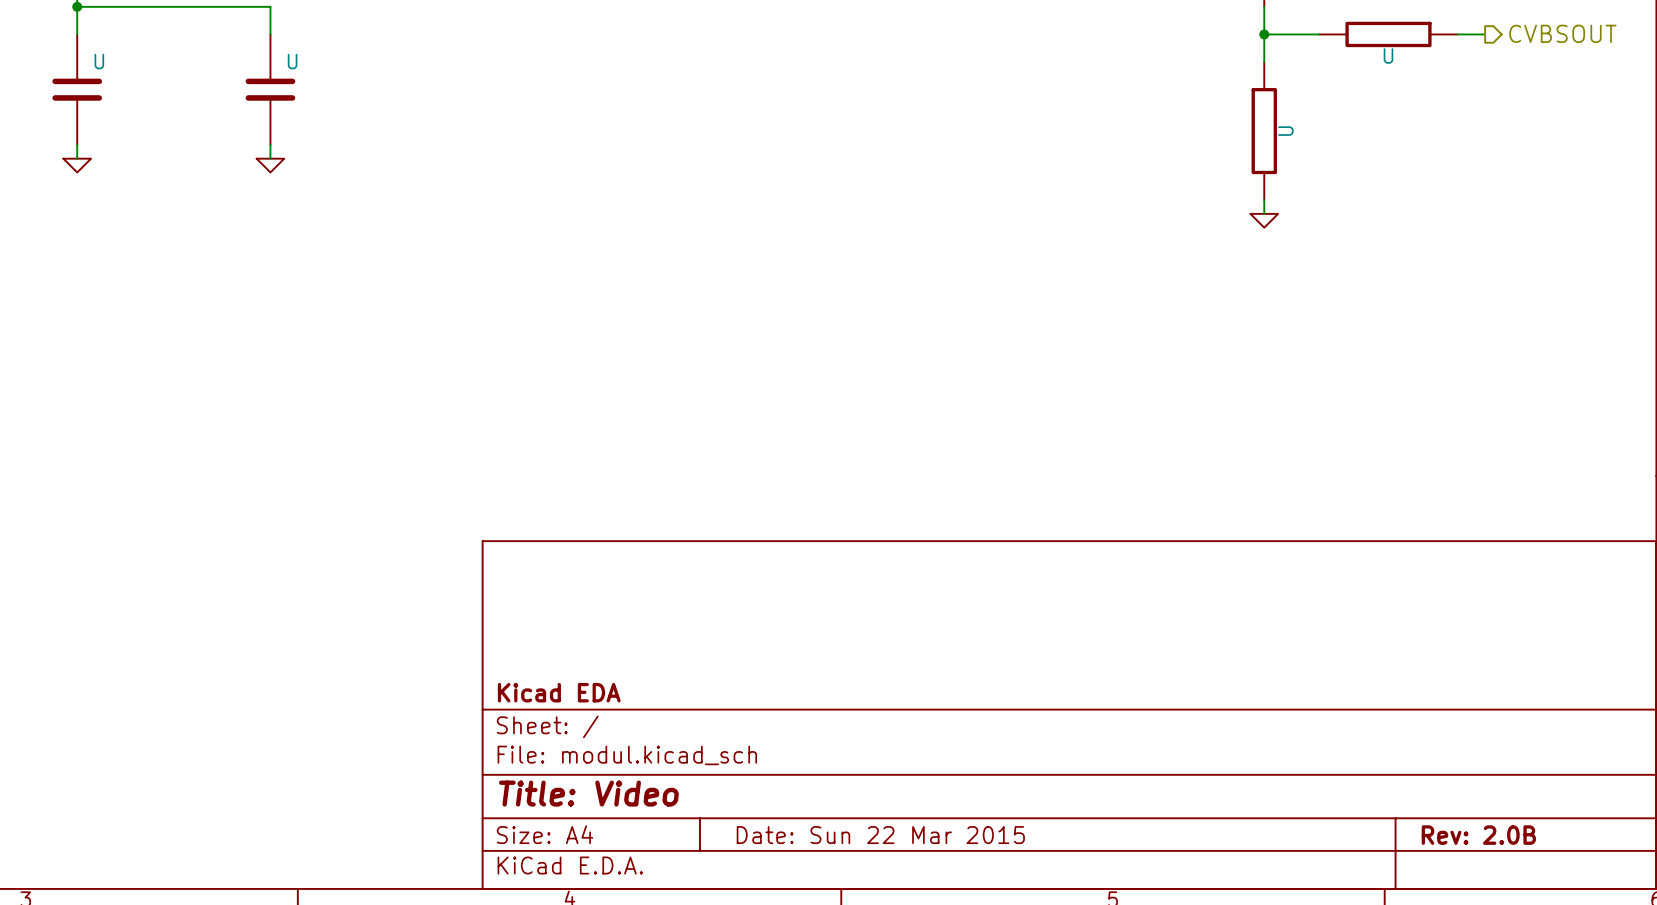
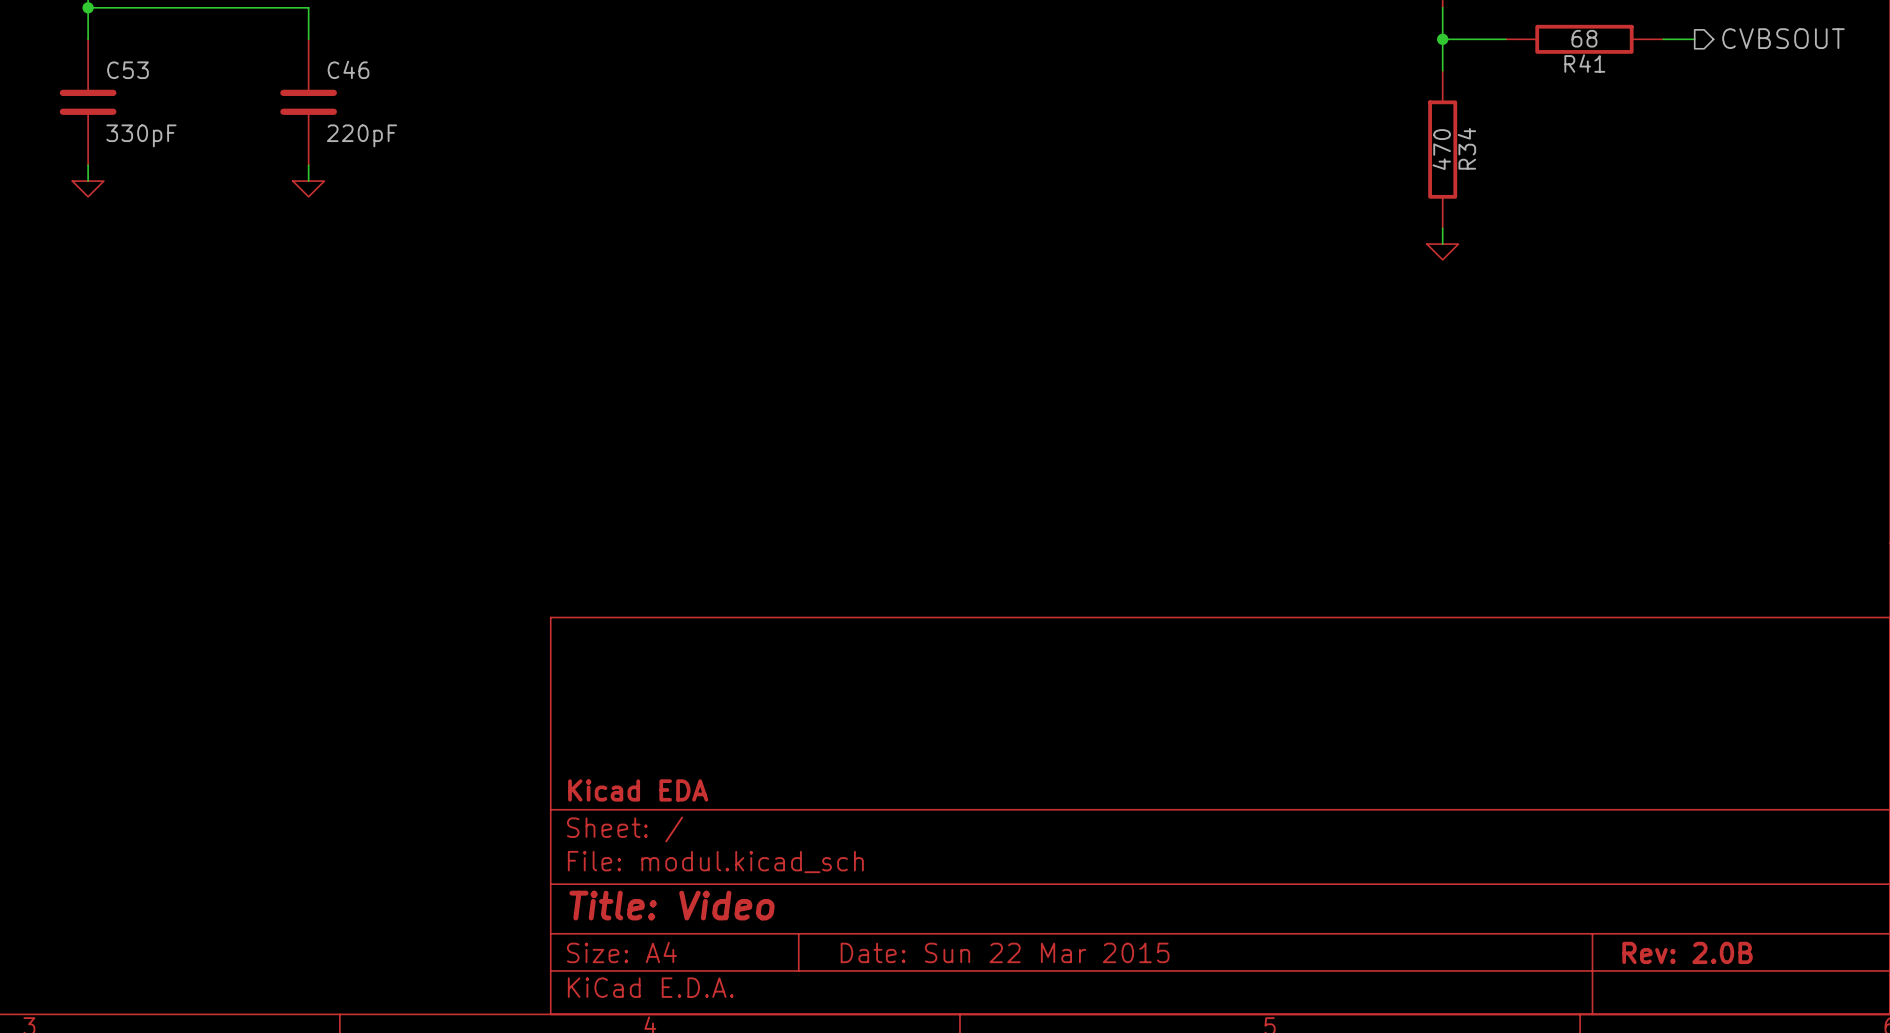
U value: none -> 68 (1584, 38)
U name: U (1388, 56) -> R41 (1584, 63)
U name: U (99, 61) -> C53 (127, 70)
U name: U (292, 61) -> C46 (348, 69)
U value: none -> 330pF (141, 135)
U value: none -> 220pF (361, 135)
U value: none -> 470 (1441, 149)
U name: U (1285, 131) -> R34 (1466, 148)

